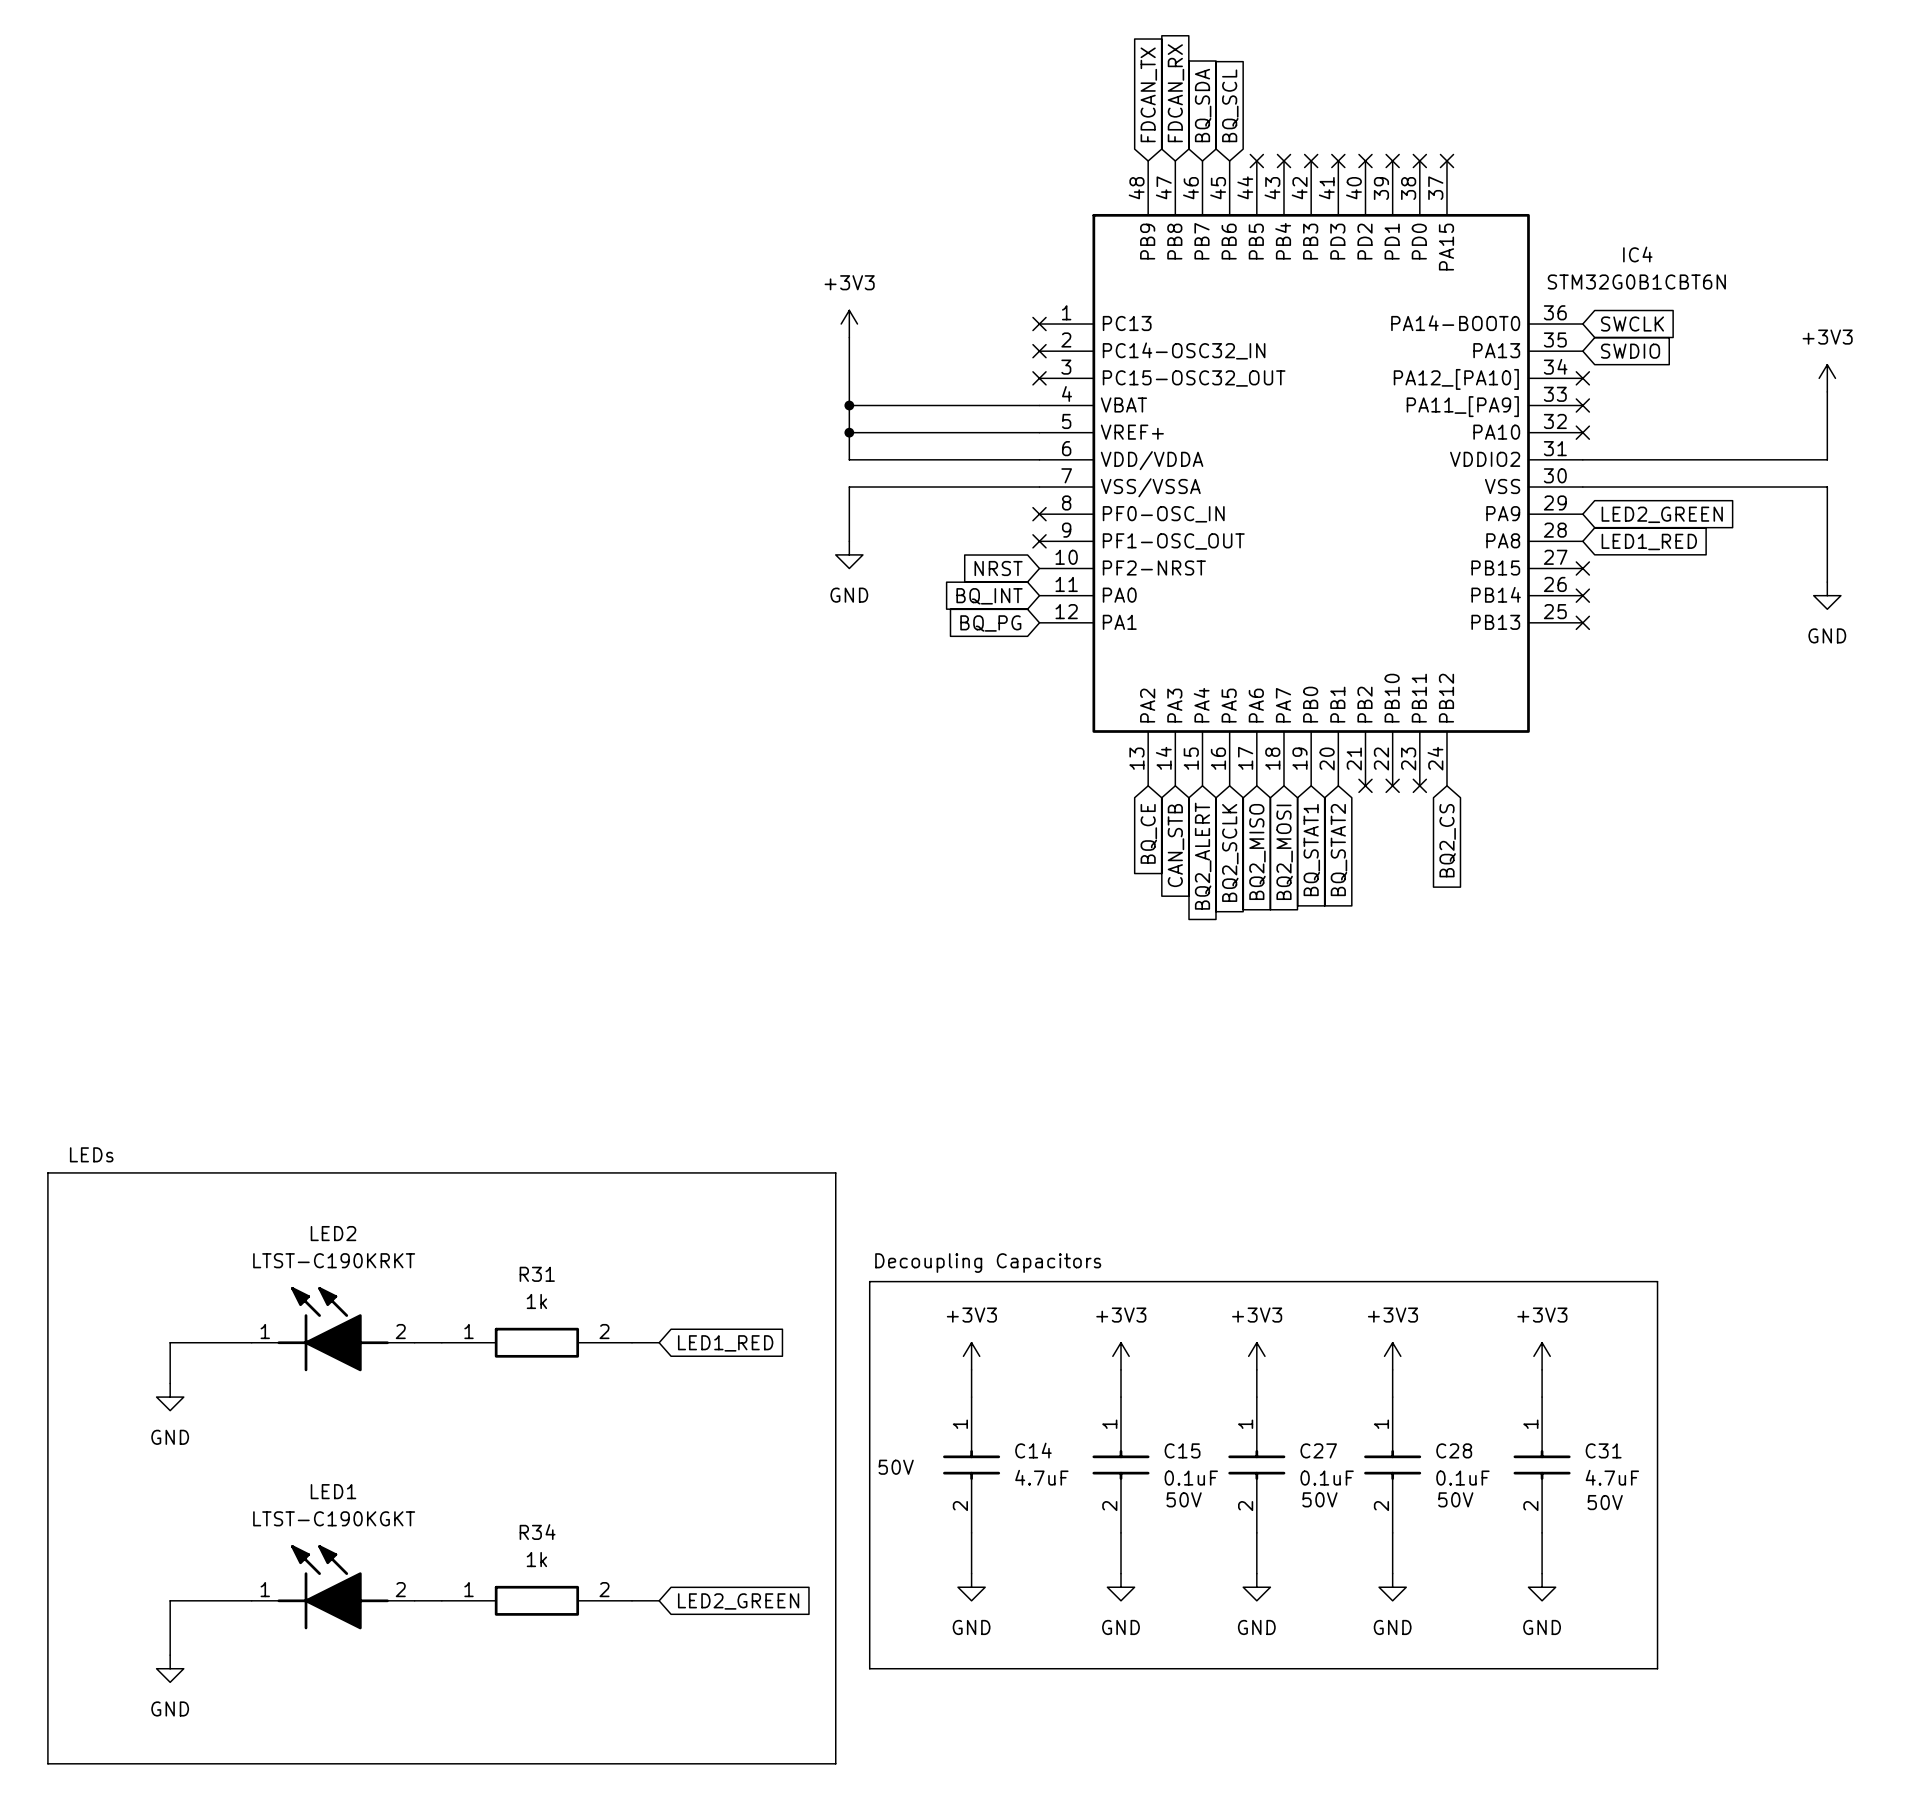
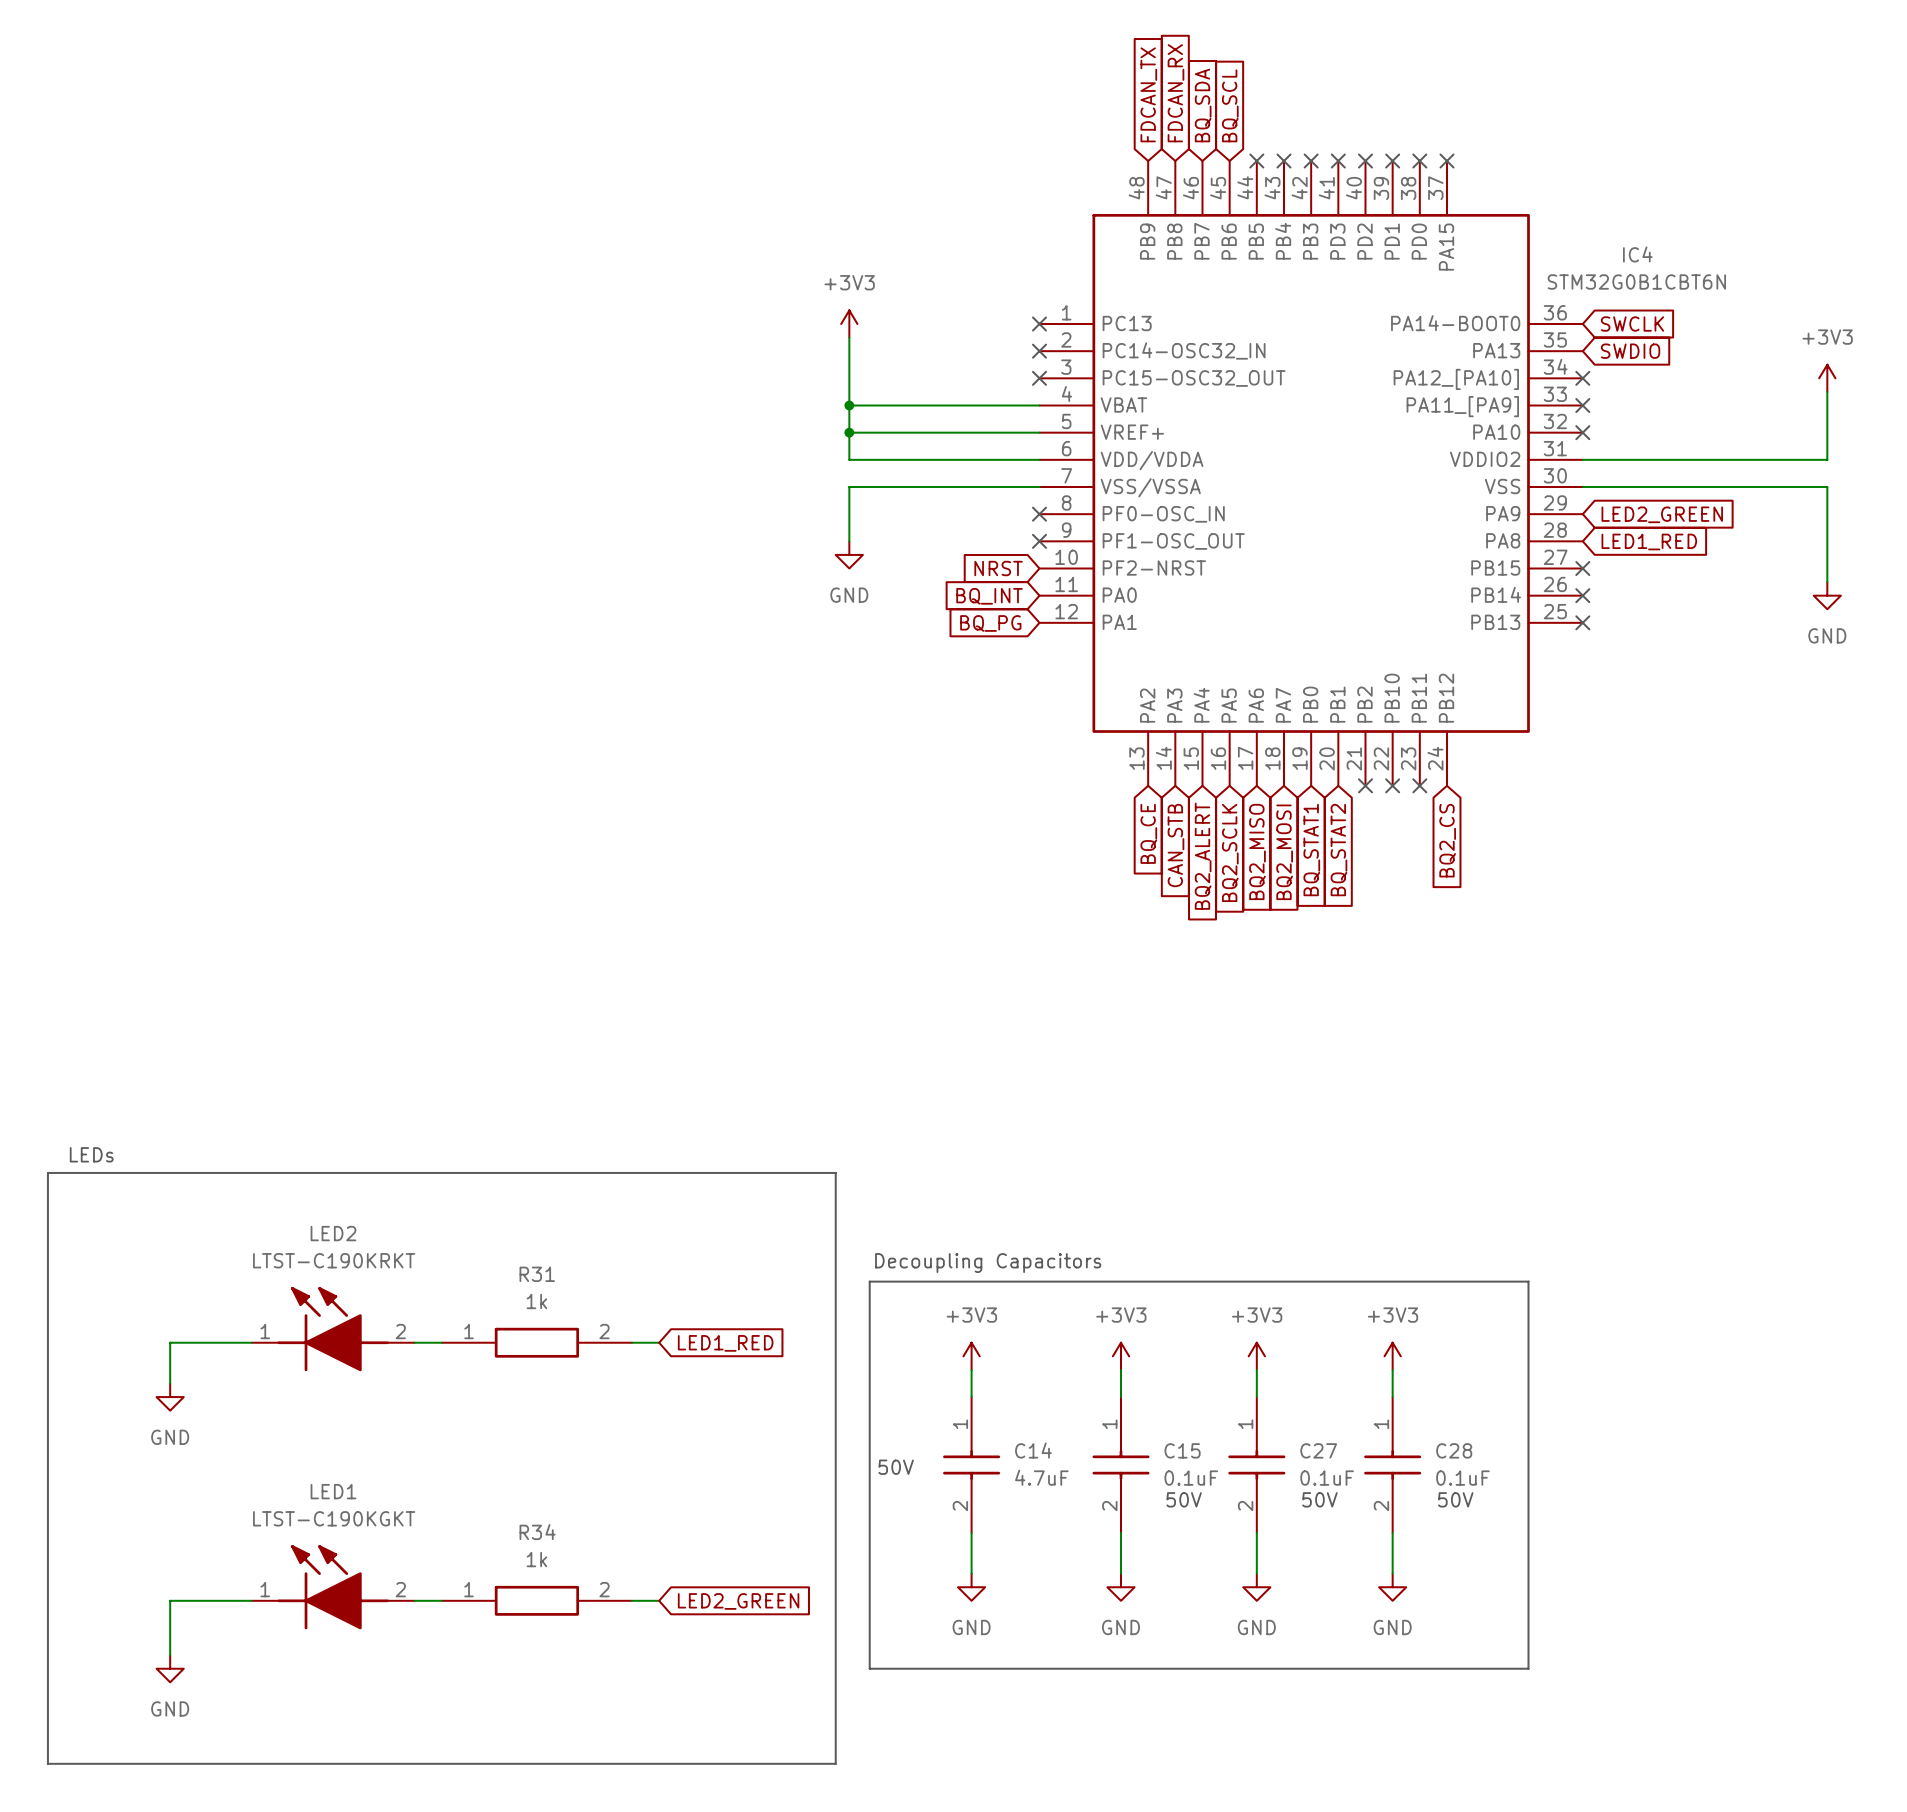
line: (1528, 1281) (1657, 1281) (1657, 1668) (1528, 1668) -> (1528, 1281) (1528, 1668)
power symbol: +3V3 (1542, 1356) -> none
wire: (1542, 1369) (1542, 1397) -> none
C31: 4.7uF (1542, 1464) -> none
text: 50V (1605, 1502) -> none
wire: (1542, 1532) (1542, 1573) -> none
power symbol: GND (1542, 1587) -> none

